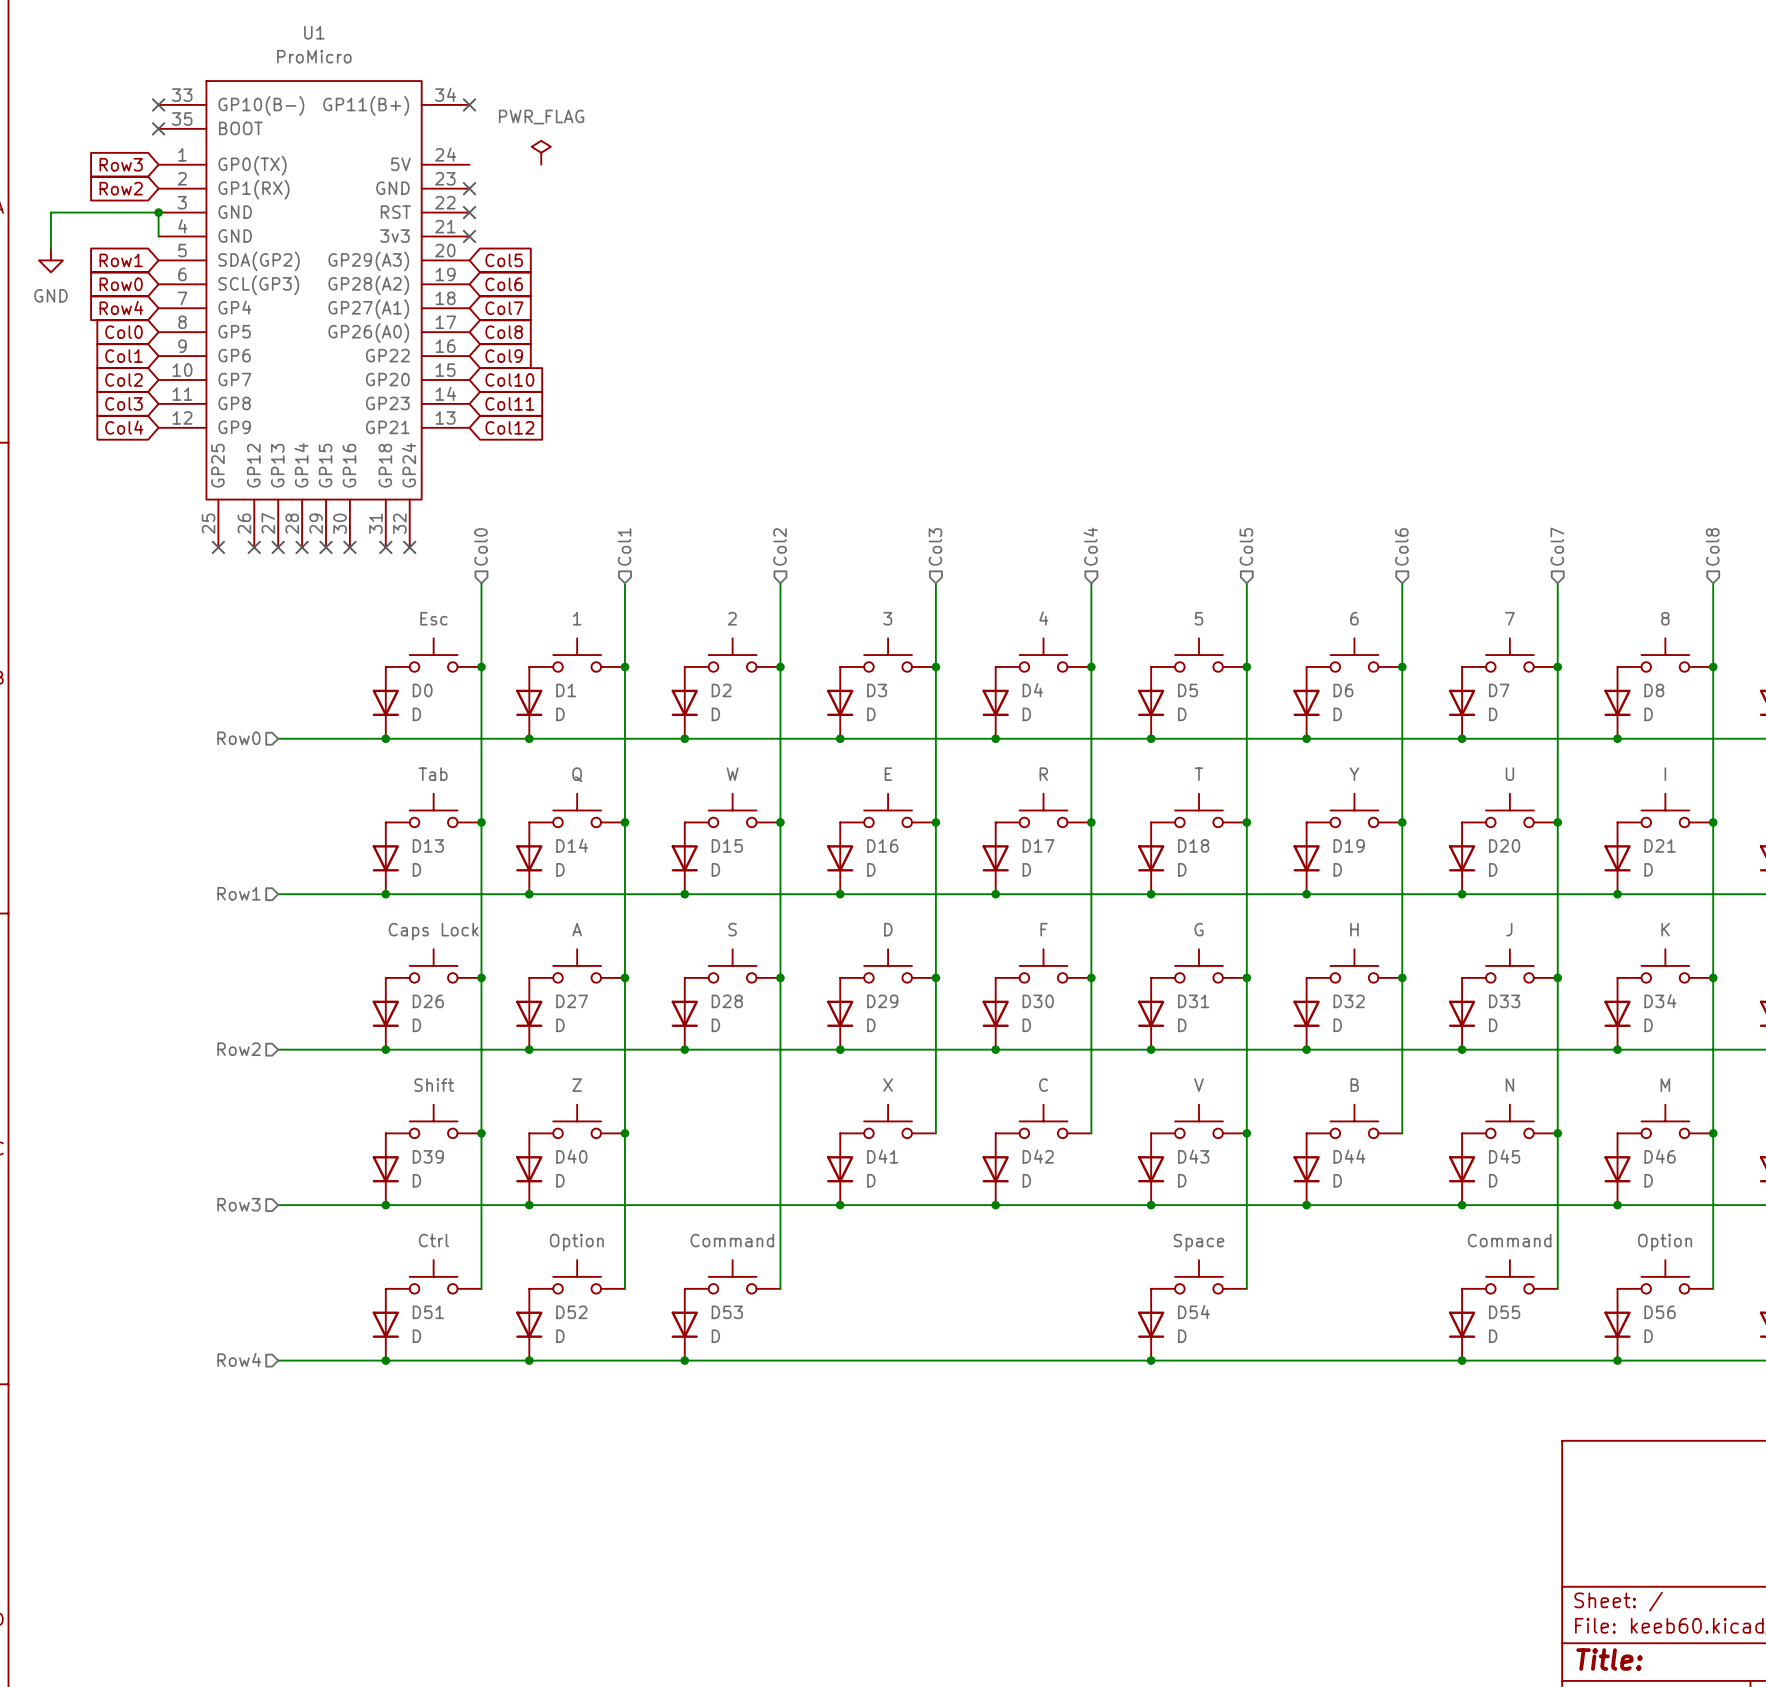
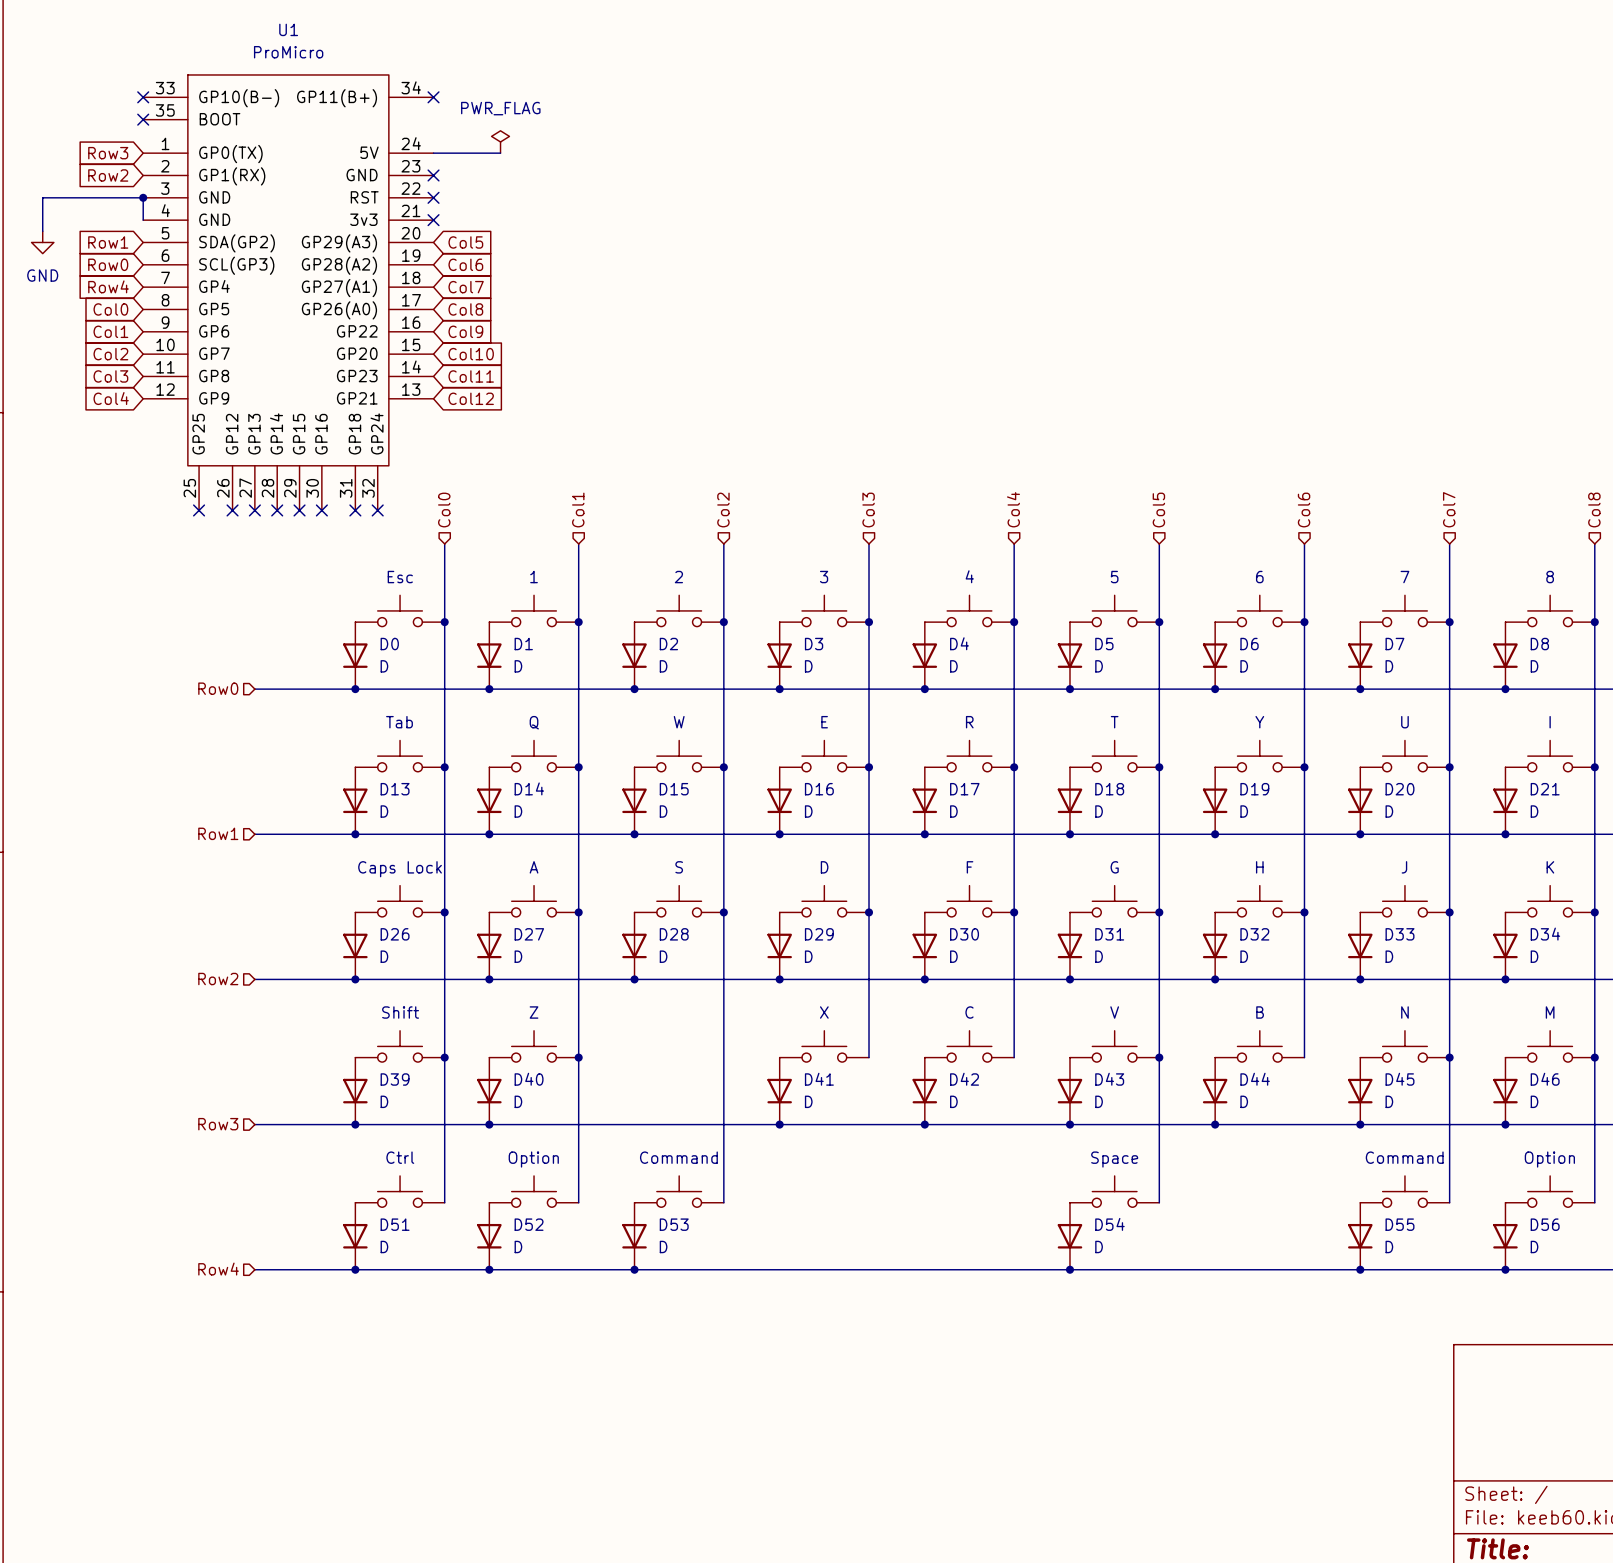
wire: none -> (433, 153) (500, 153)

